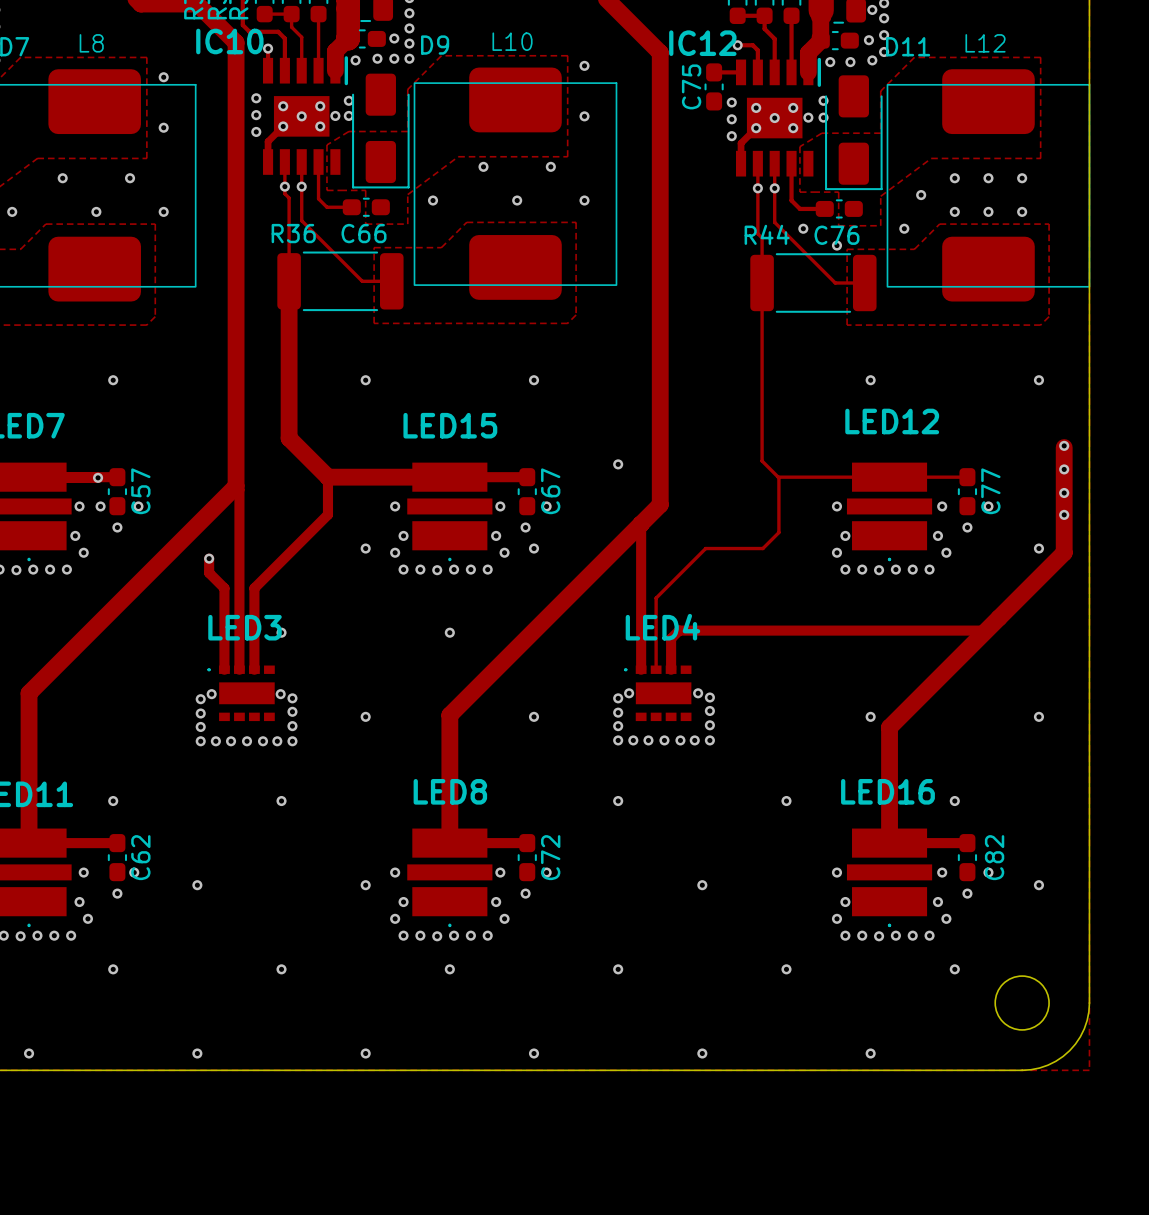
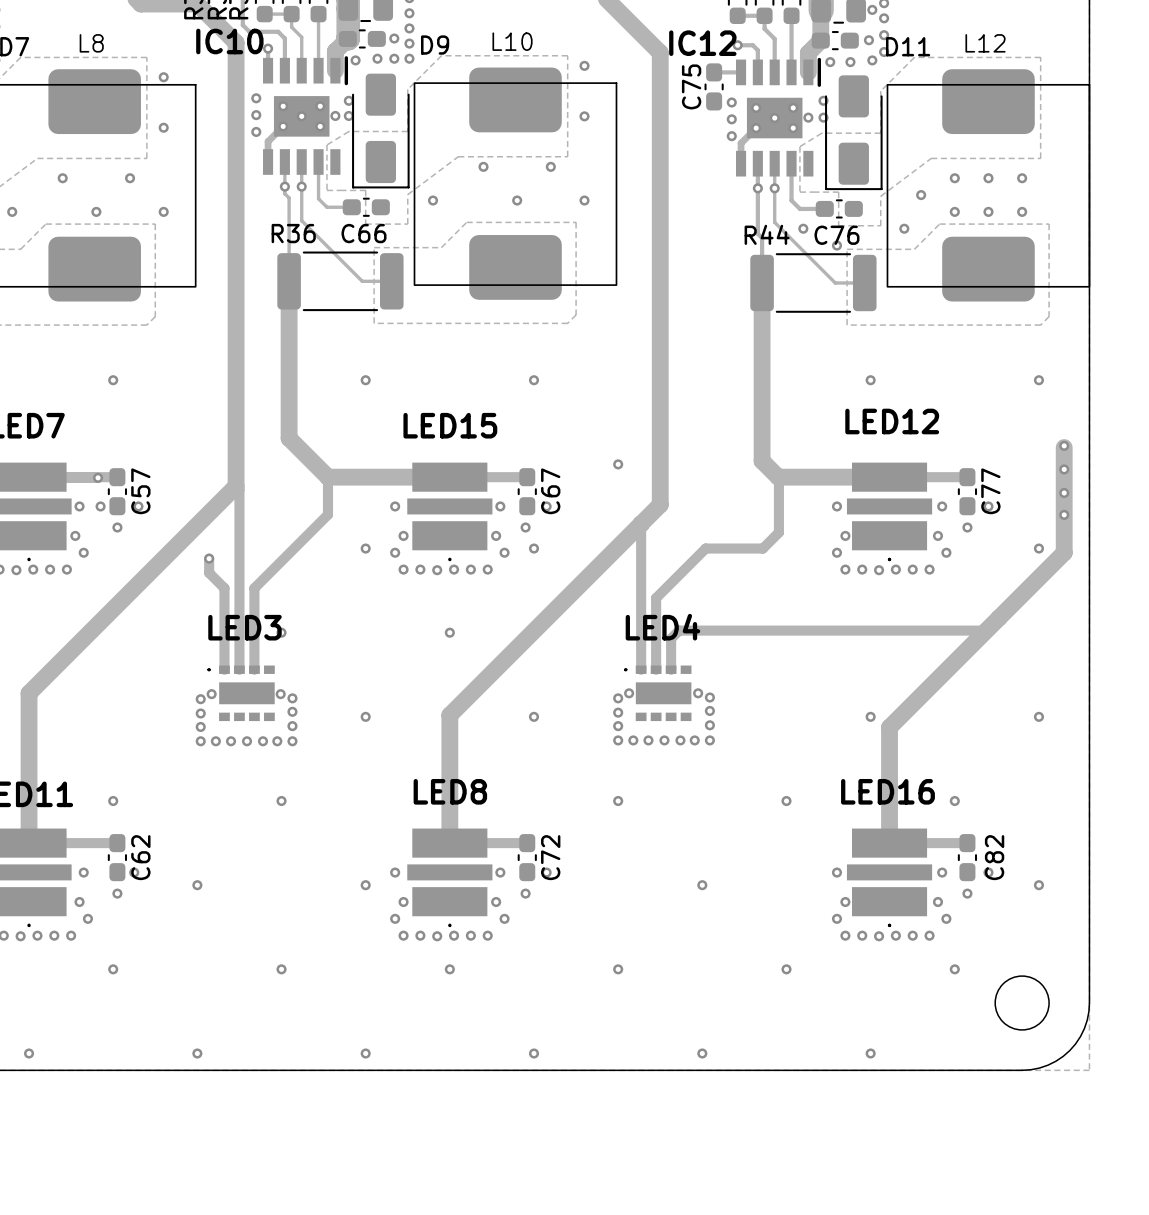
track width: thin (757, 163) (757, 233) (762, 237) (762, 461) (778, 477) (778, 532) (762, 548) (705, 548) (656, 598) (656, 669) -> thick (757, 163) (757, 233) (762, 237) (762, 461) (778, 477) (778, 532) (762, 548) (705, 548) (656, 598) (656, 669)
track width: thin (778, 477) (967, 477) -> thick (778, 477) (967, 477)

